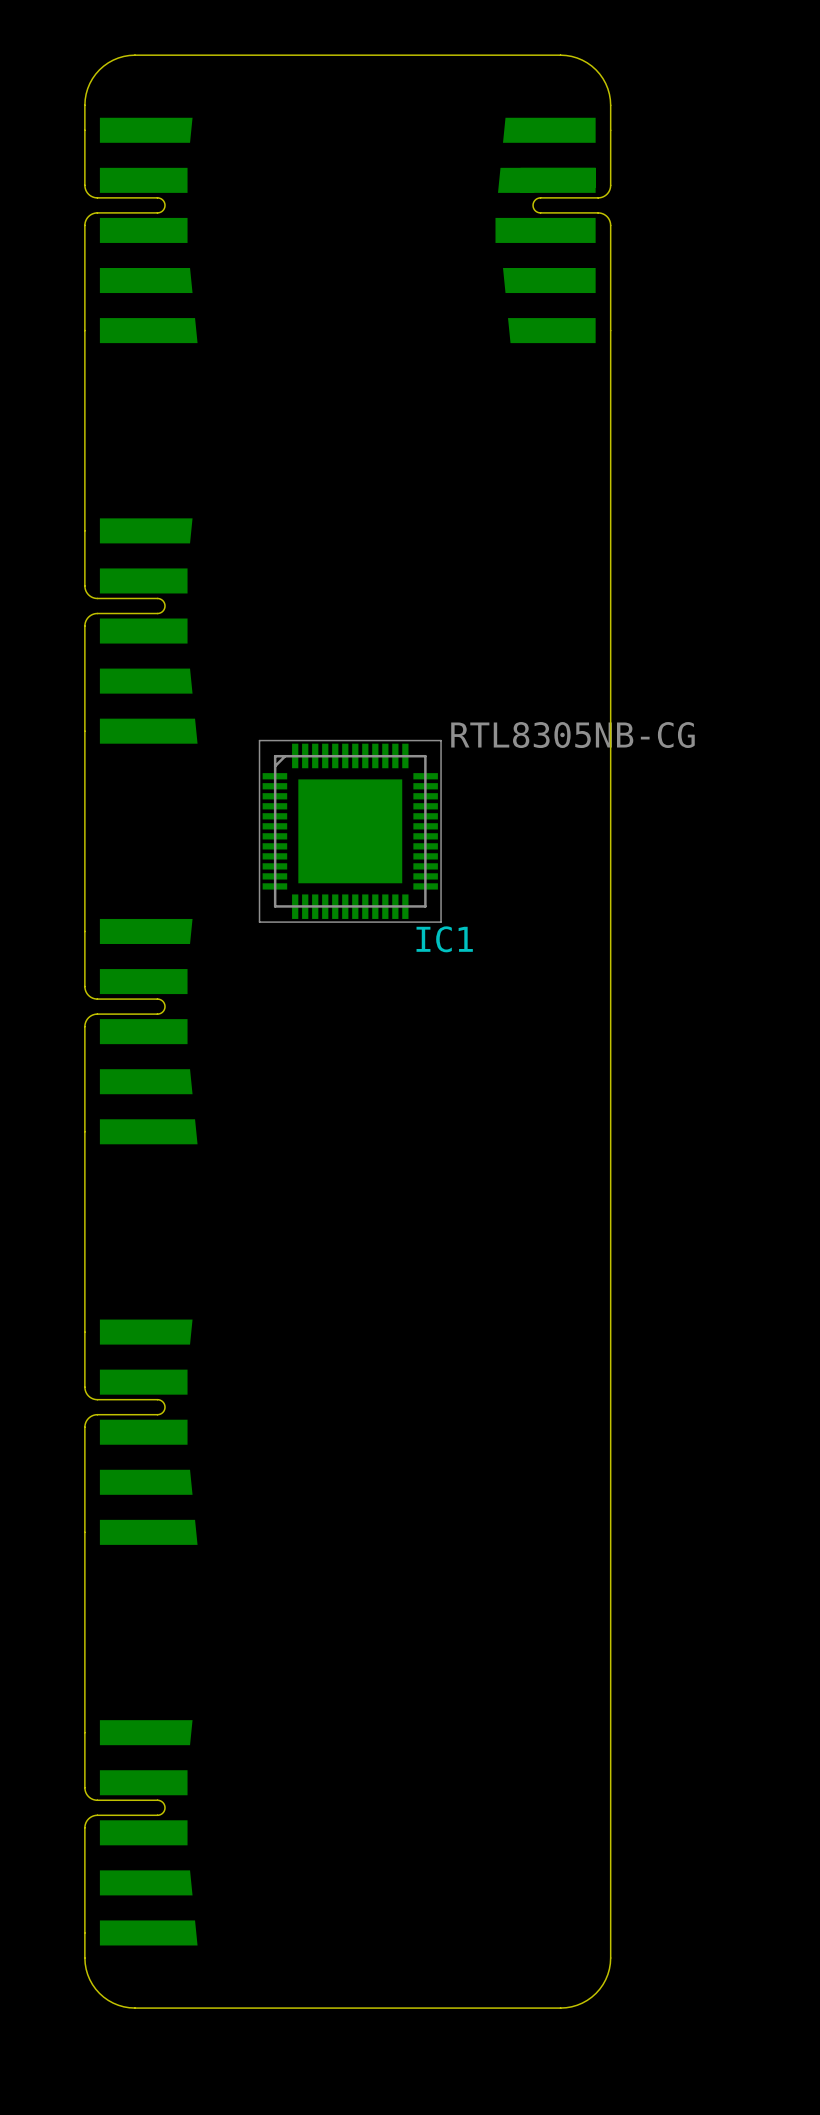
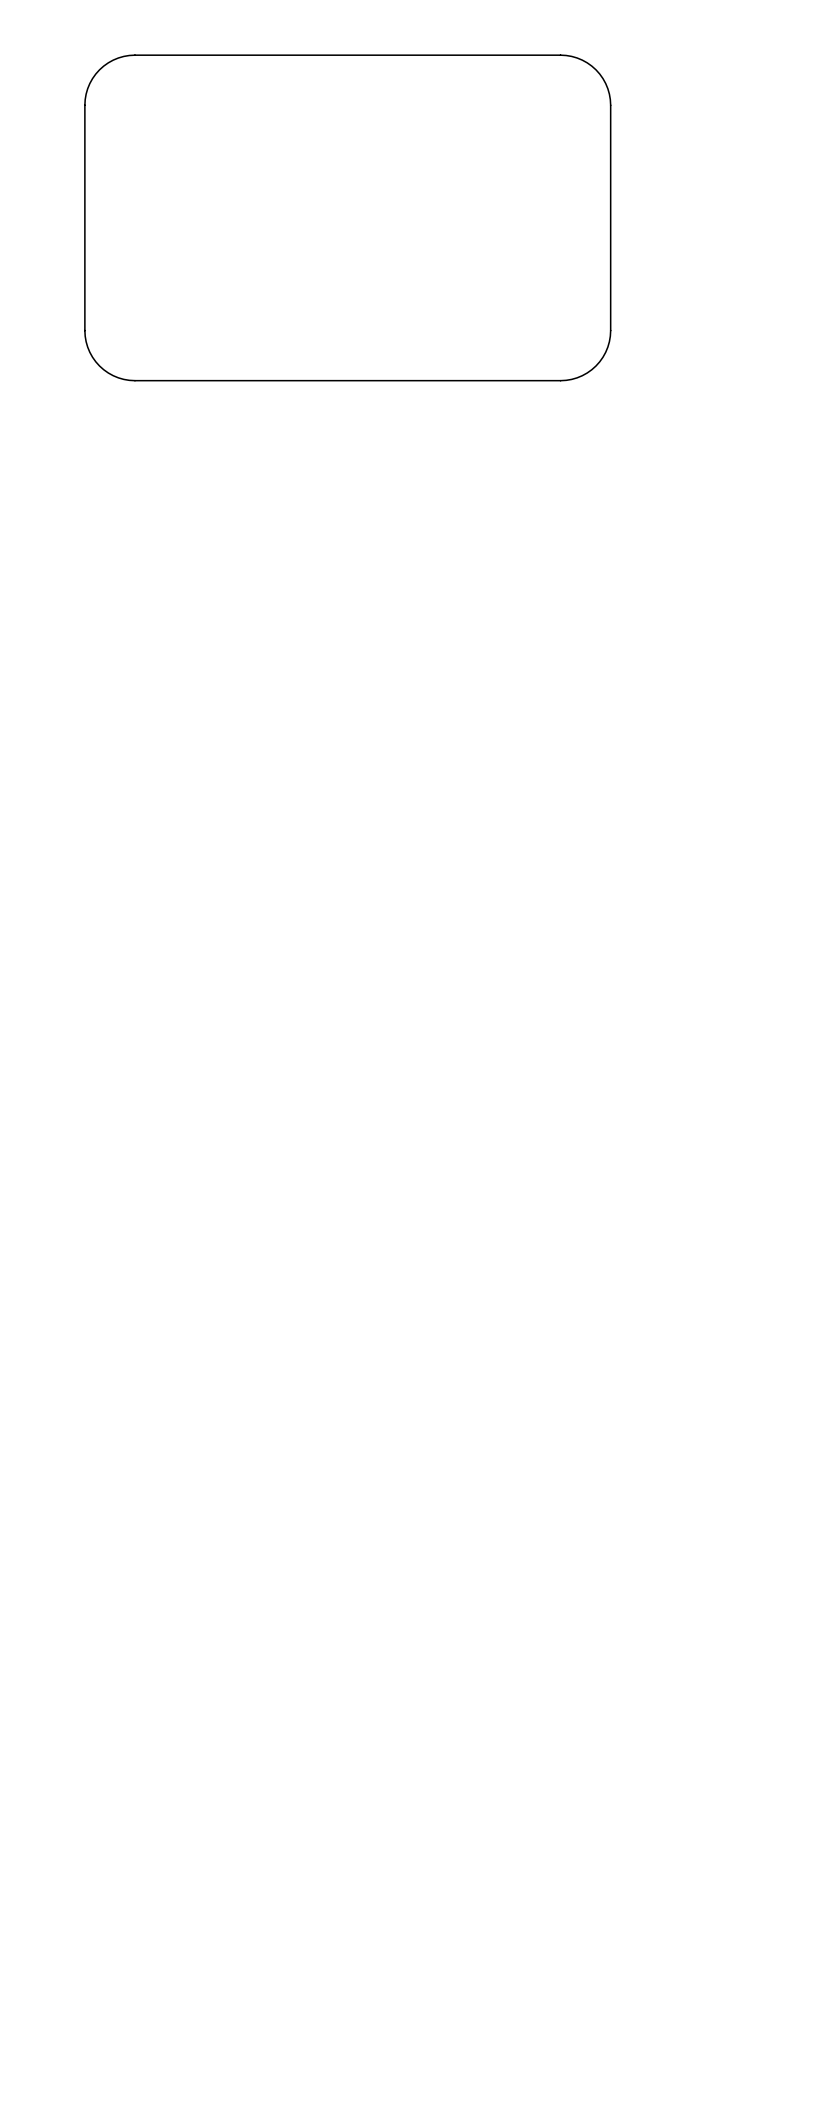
board edge: none -> (610, 130) (609, 341) (602, 357) (591, 369) (577, 377) (560, 380) (134, 380) (113, 375) (95, 361) (87, 347) (85, 336) (84, 130)
part: (140, 230) -> none
part: (553, 230) -> none
board edge: (84, 330) (84, 530) -> none
board edge: (610, 330) (610, 1958) (607, 1974) (599, 1989) (591, 1997) (582, 2003) (566, 2007) (129, 2007) (108, 2000) (92, 1984) (85, 1963) (84, 1932) -> none
part: (140, 631) -> none
board edge: (84, 731) (84, 931) -> none
IC1: RTL8305NB-CG (350, 831) -> none
part: (140, 1031) -> none
board edge: (84, 1131) (84, 1332) -> none
part: (140, 1432) -> none
board edge: (84, 1532) (84, 1732) -> none
part: (140, 1832) -> none

